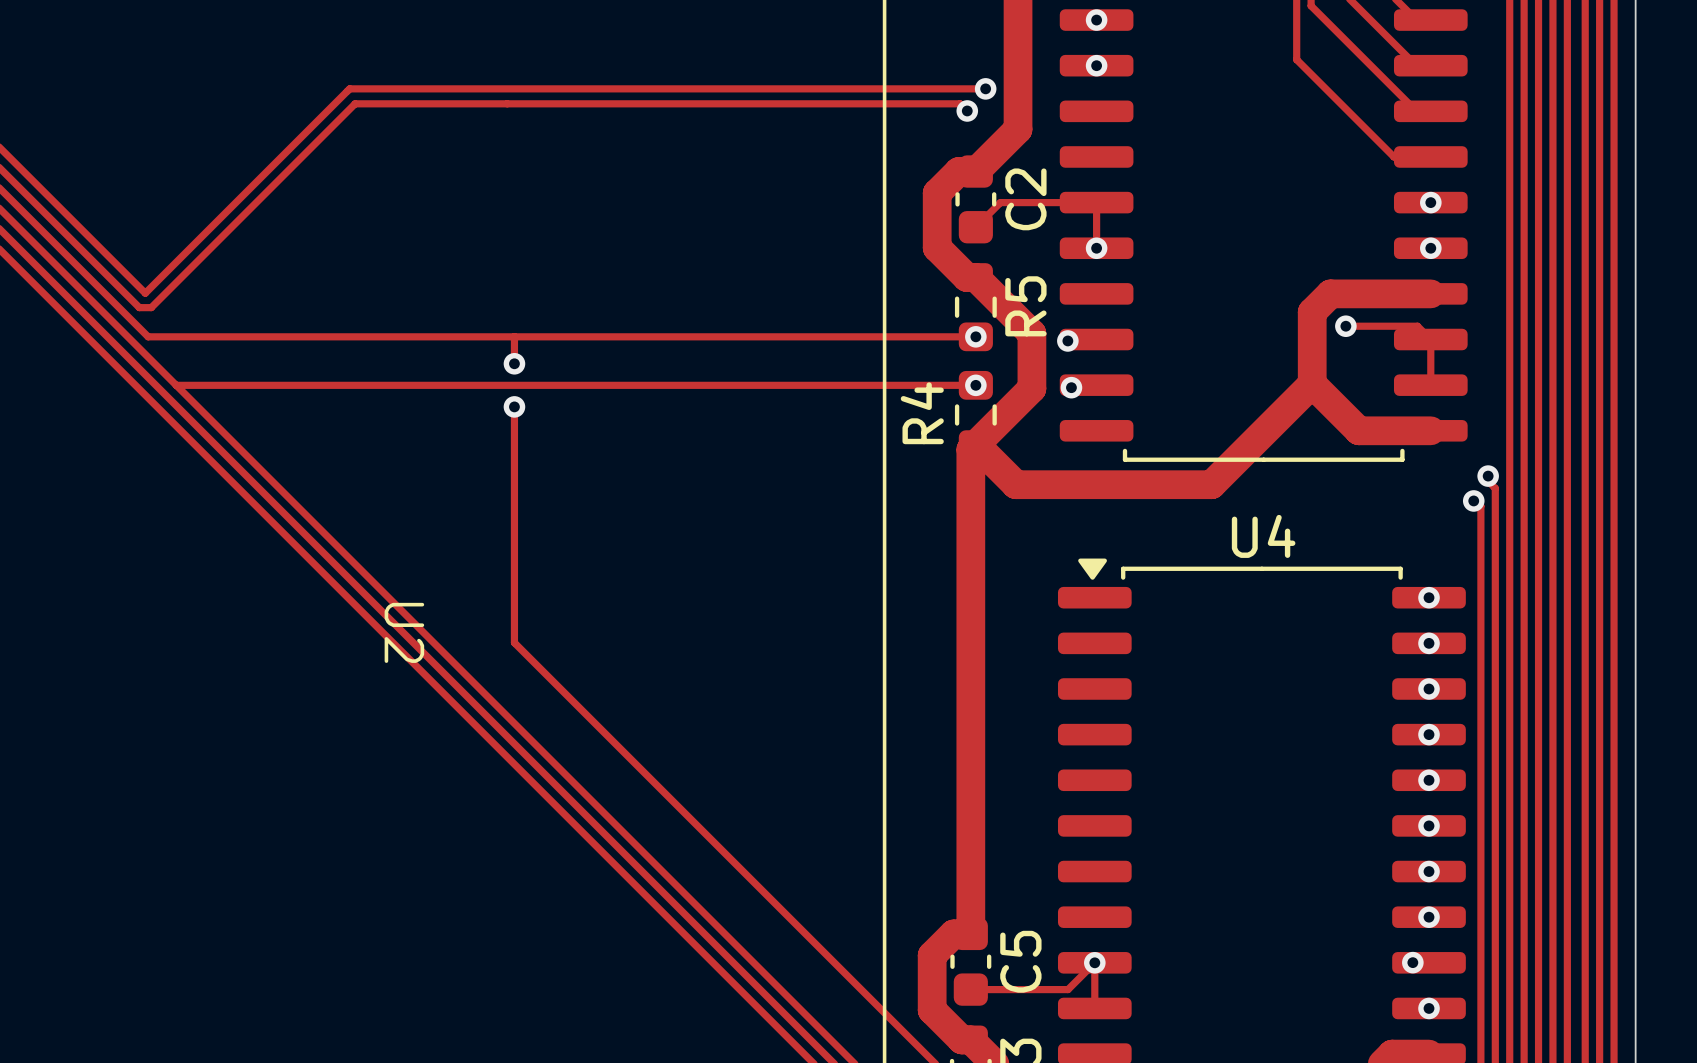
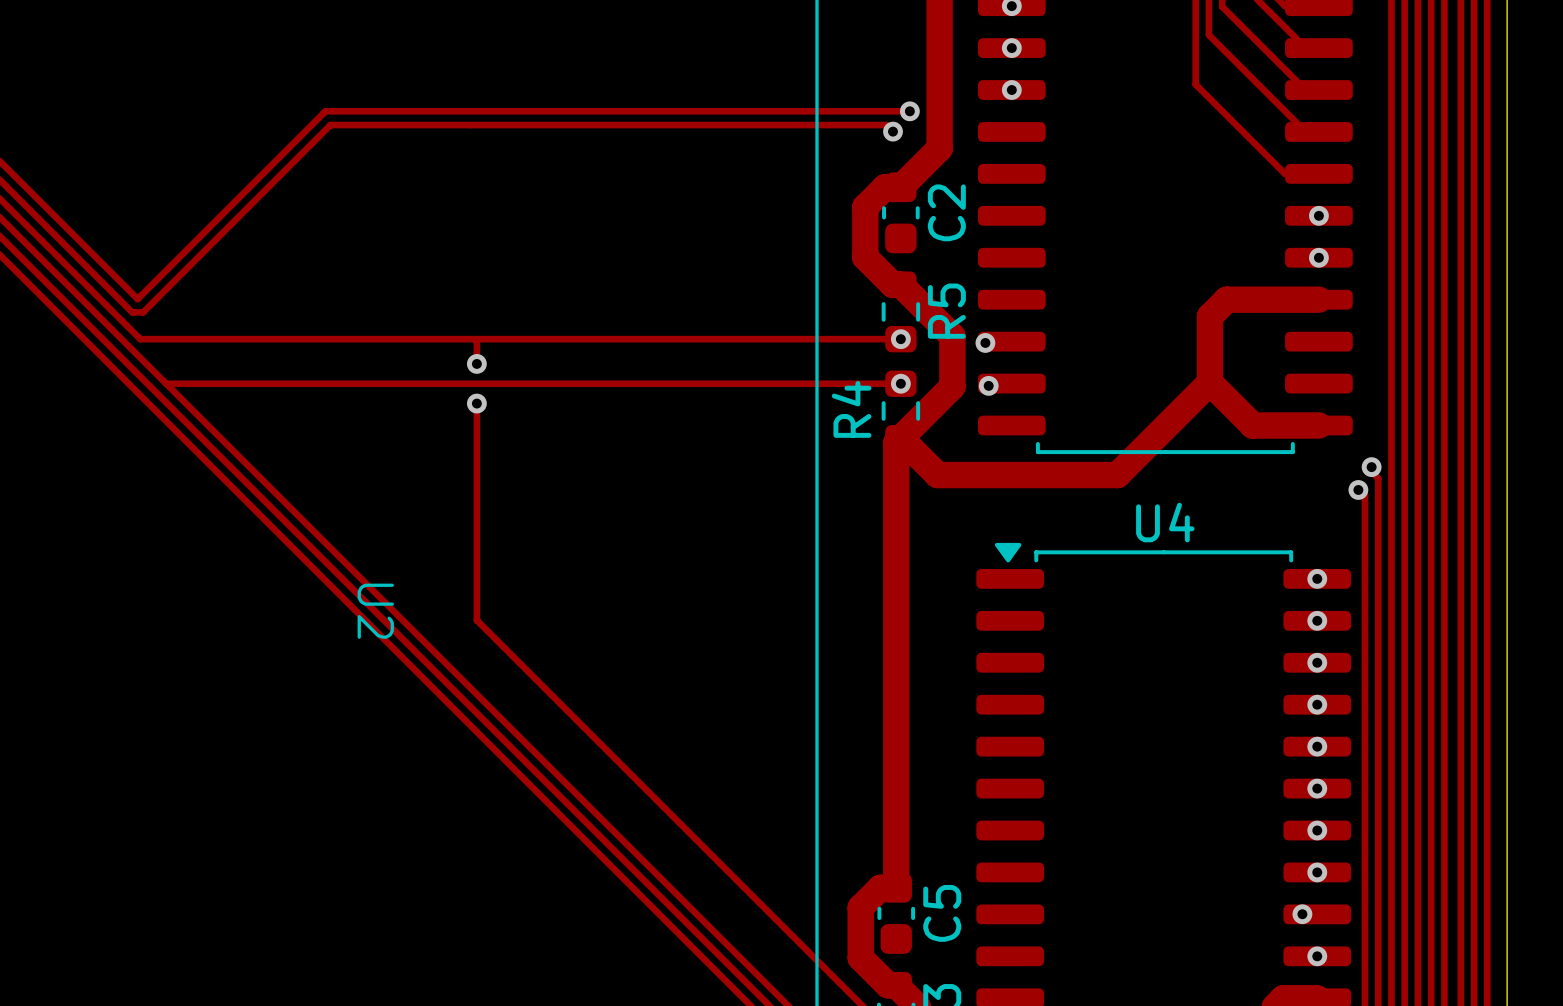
track: (975, 227) (1000, 202) (1096, 202) (1096, 248) -> none
via: (1096, 248) -> none
track: (1345, 326) (1417, 326) (1430, 339) (1430, 385) -> none
via: (1345, 326) -> none
via: (1094, 962) -> none
track: (970, 989) (1068, 989) (1094, 962) (1094, 1008) -> none

